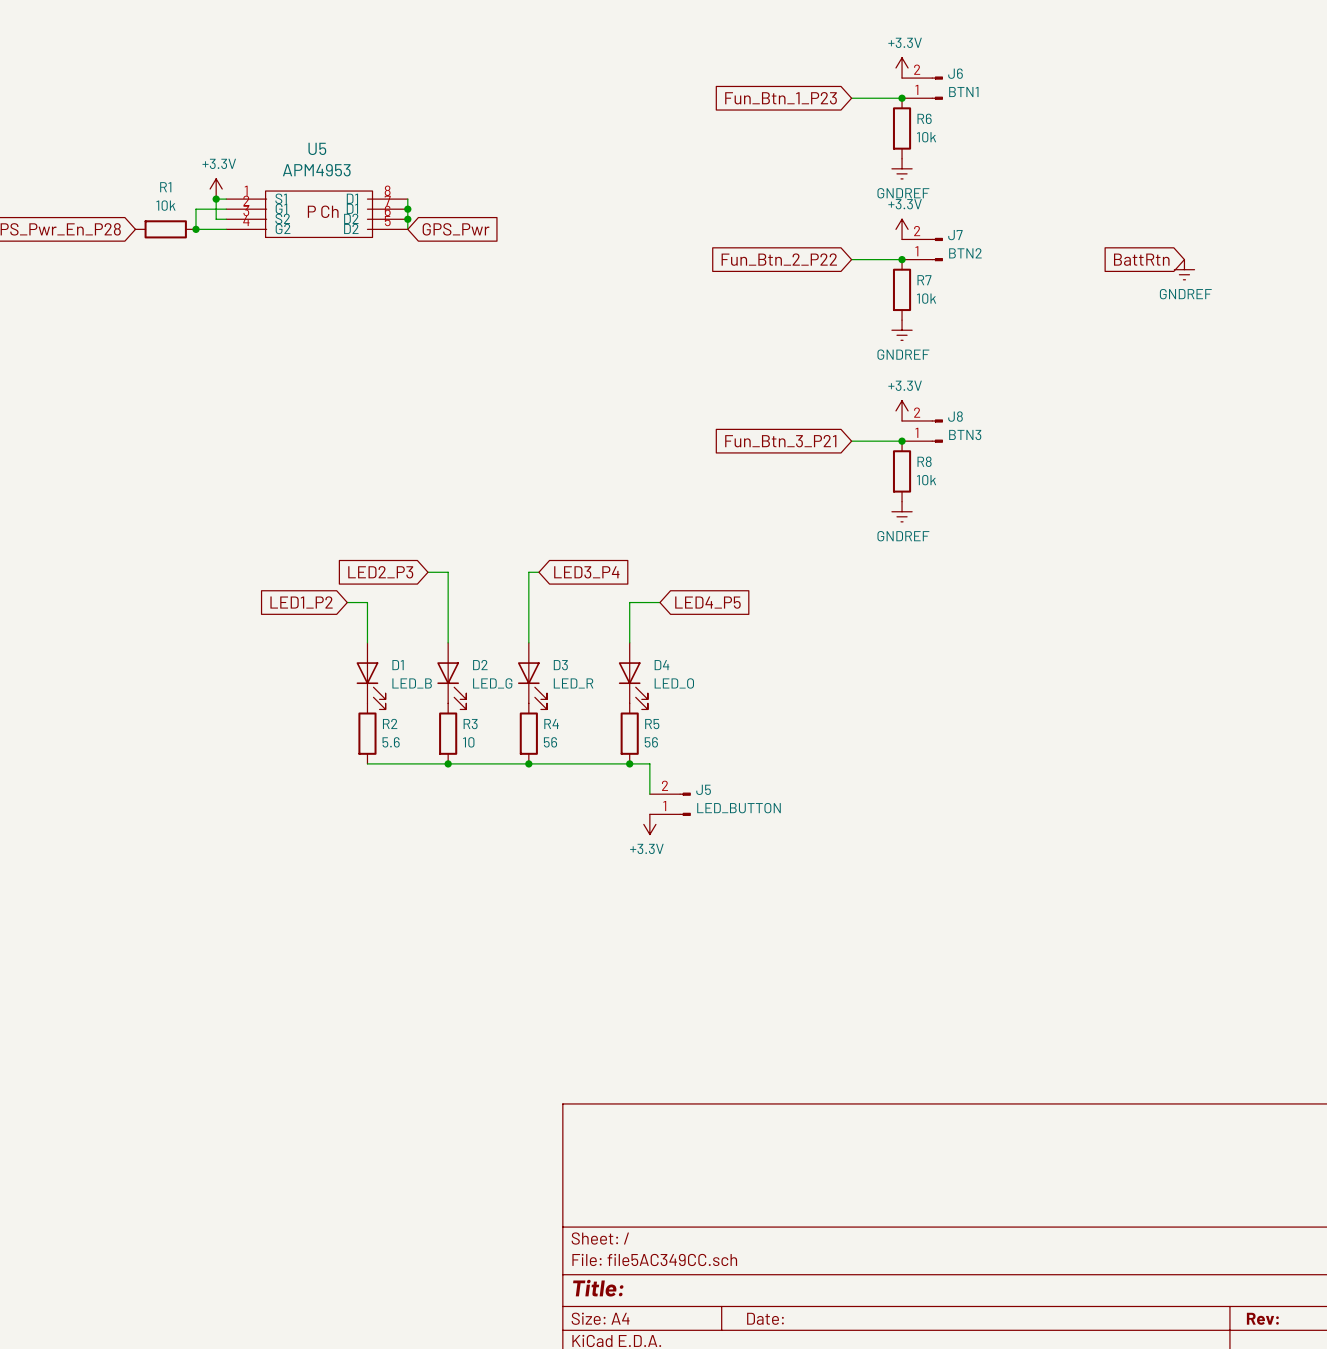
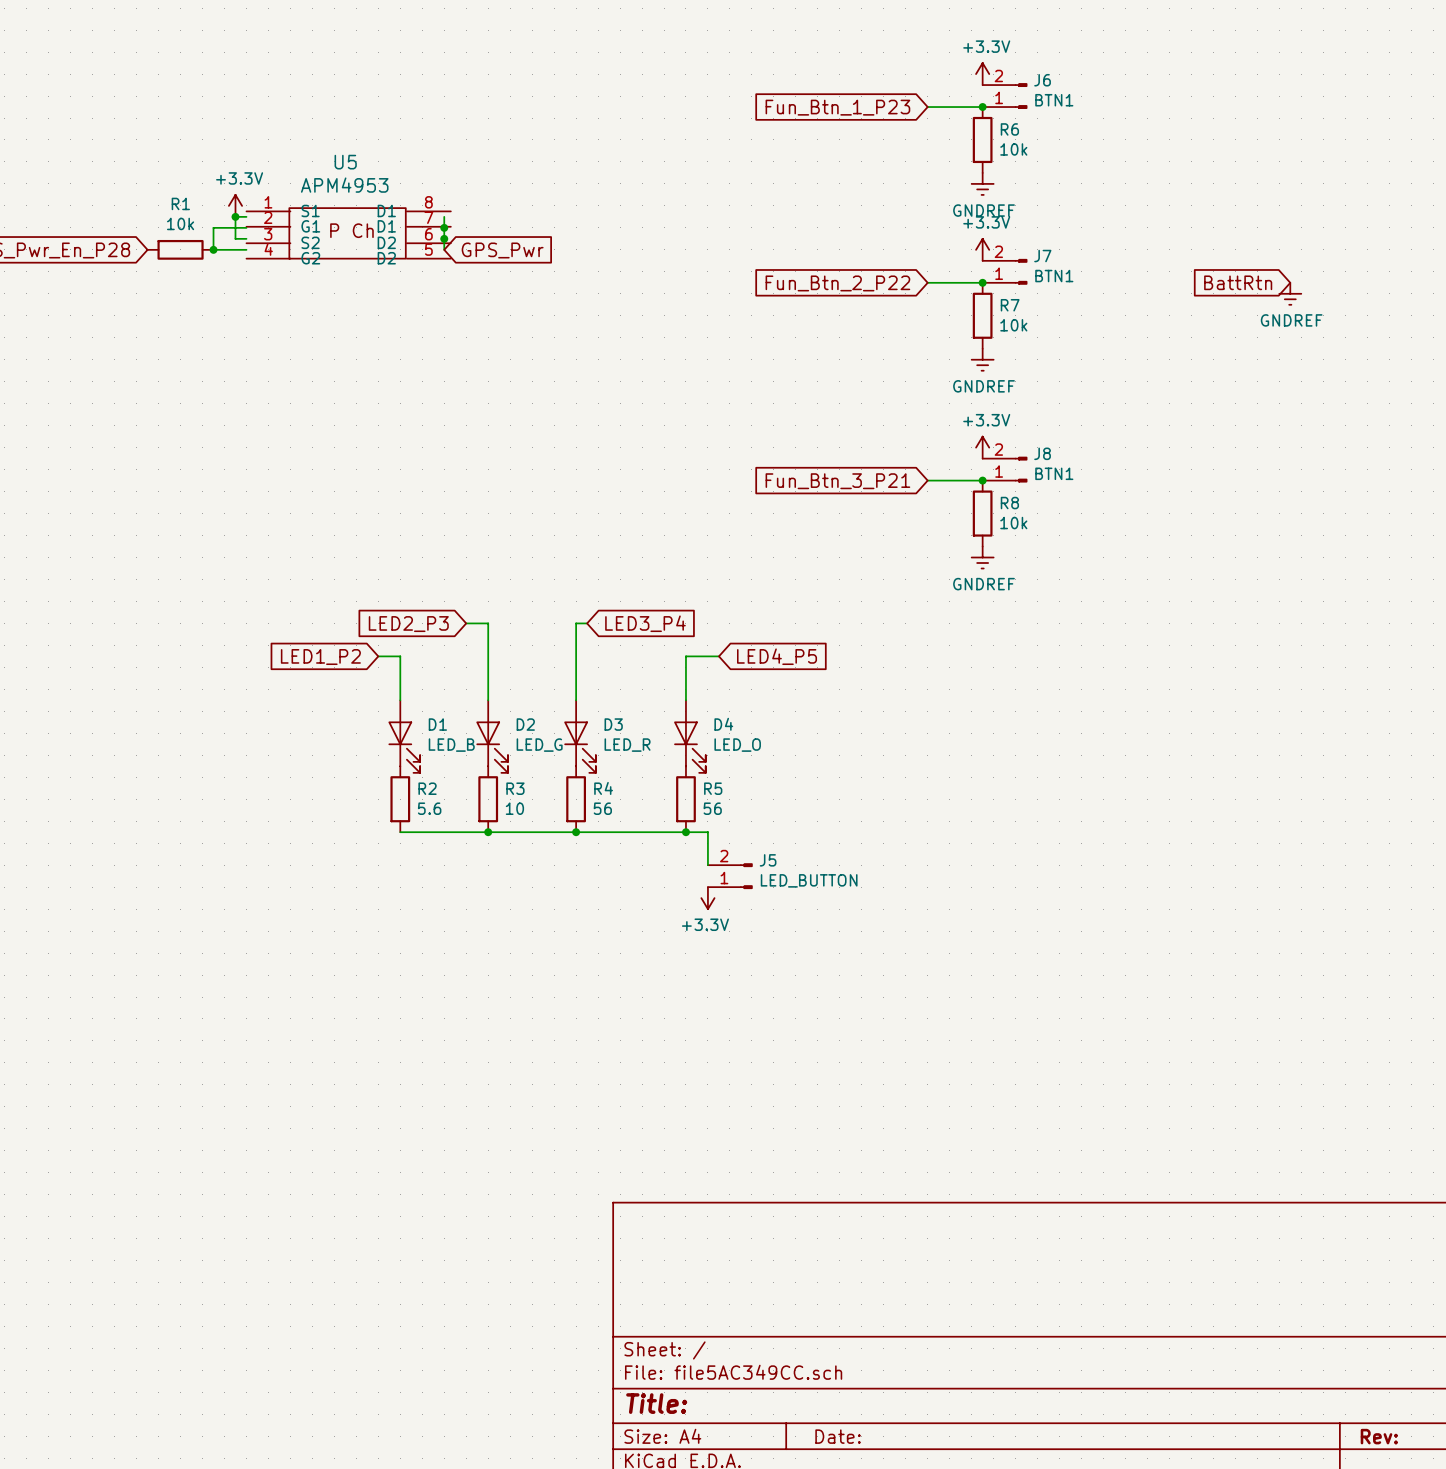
U5 symbol: [226, 191, 408, 238] -> [246, 208, 451, 259]
J7 value: BTN2 (965, 253) -> BTN1 (1054, 276)
J8 value: BTN3 (965, 434) -> BTN1 (1054, 473)

